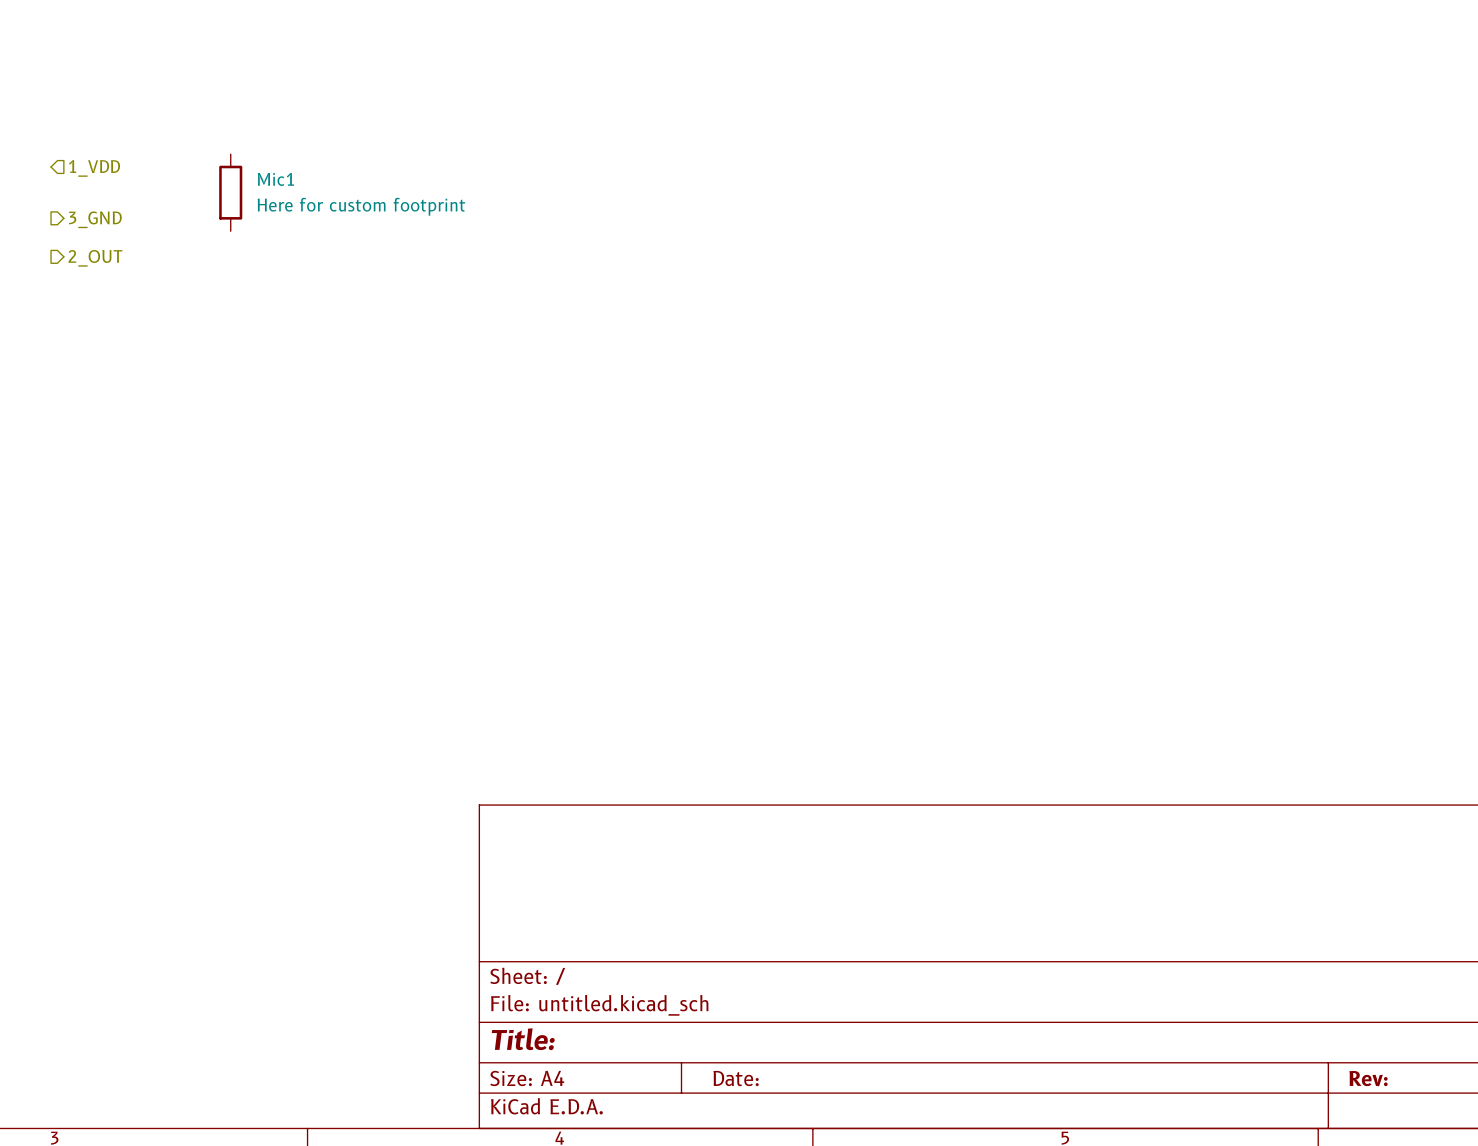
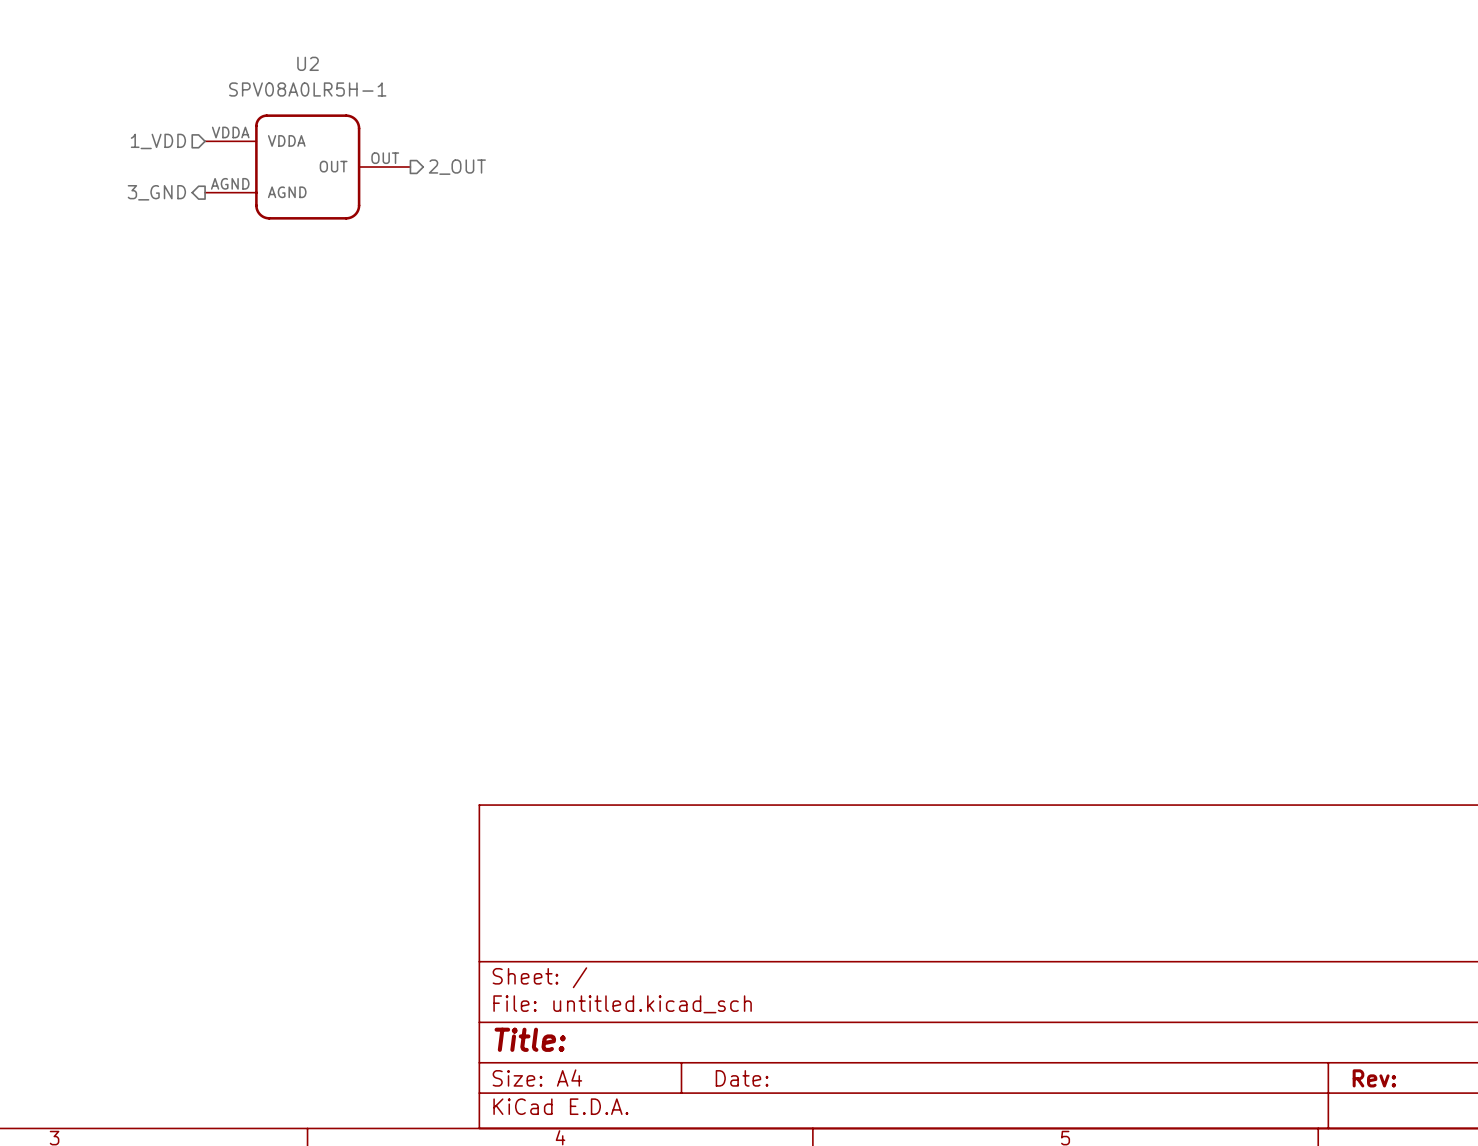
U2: none -> SPV08A0LR5H-1 (307, 167)
hierarchical label rotation: 0° (94, 168) -> 180° (158, 141)
hierarchical label: none -> 2_OUT (457, 167)
Mic1: Here for custom footprint (230, 192) -> none
hierarchical label rotation: 0° (95, 219) -> 180° (156, 192)
hierarchical label: 2_OUT (95, 258) -> none

